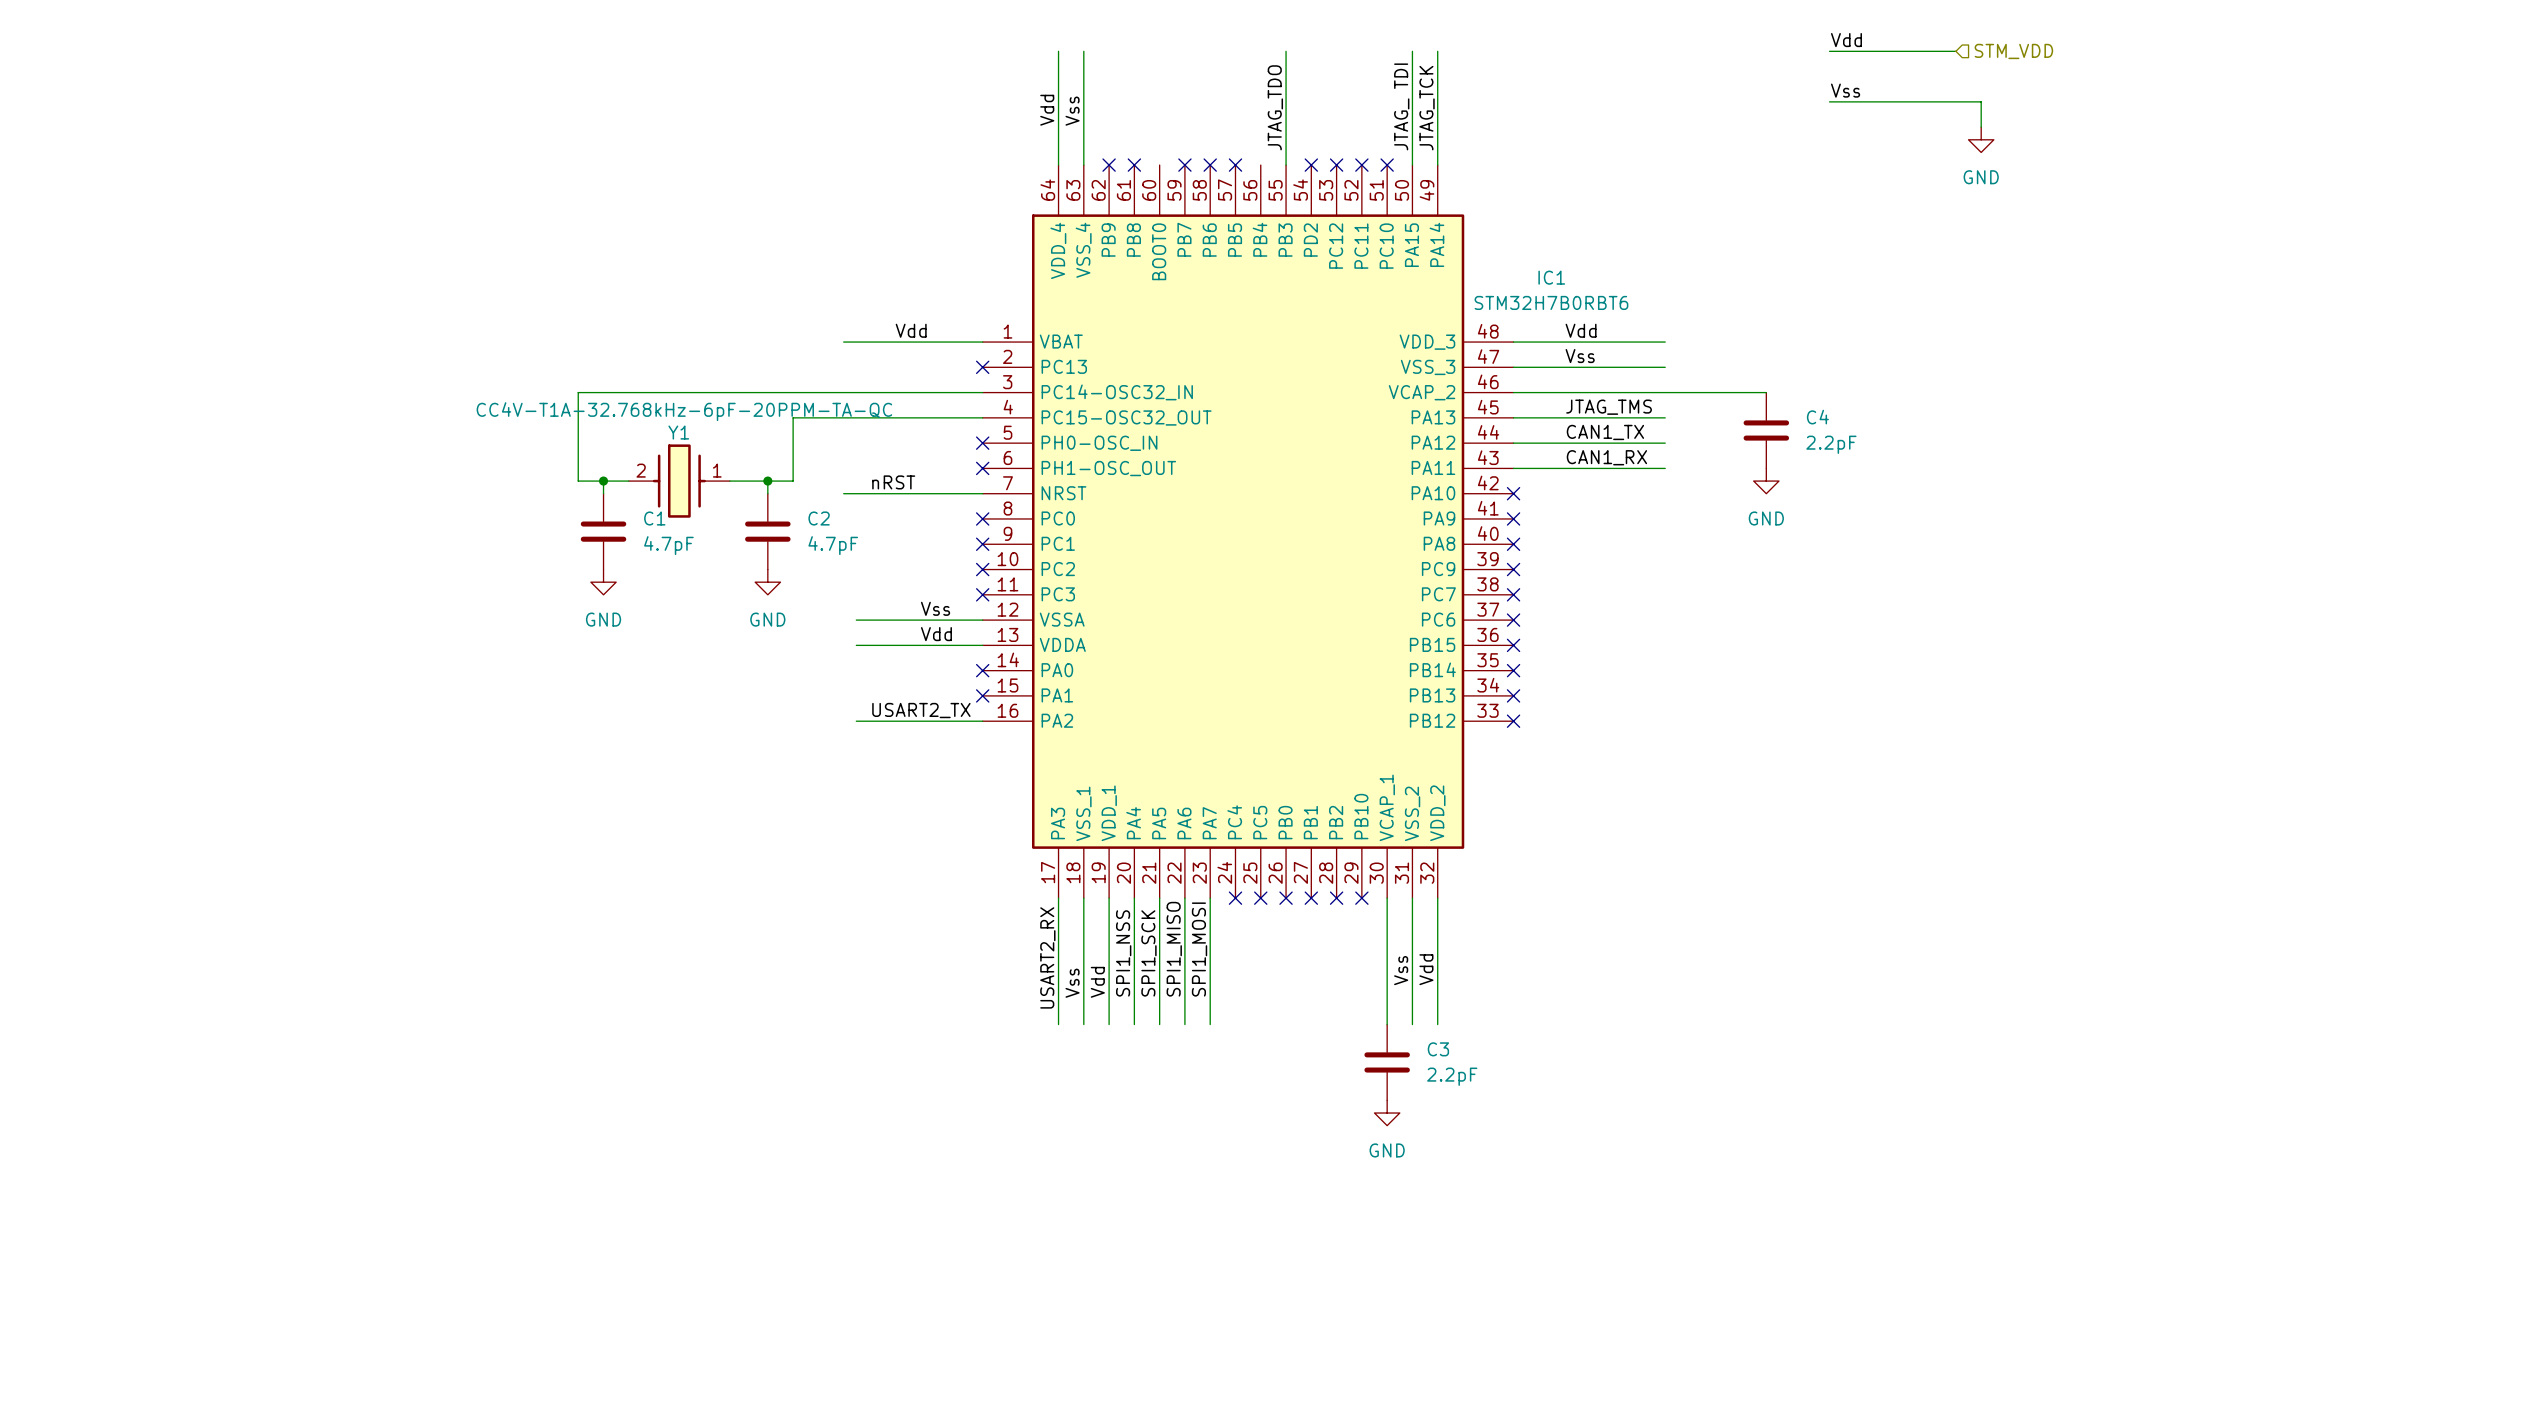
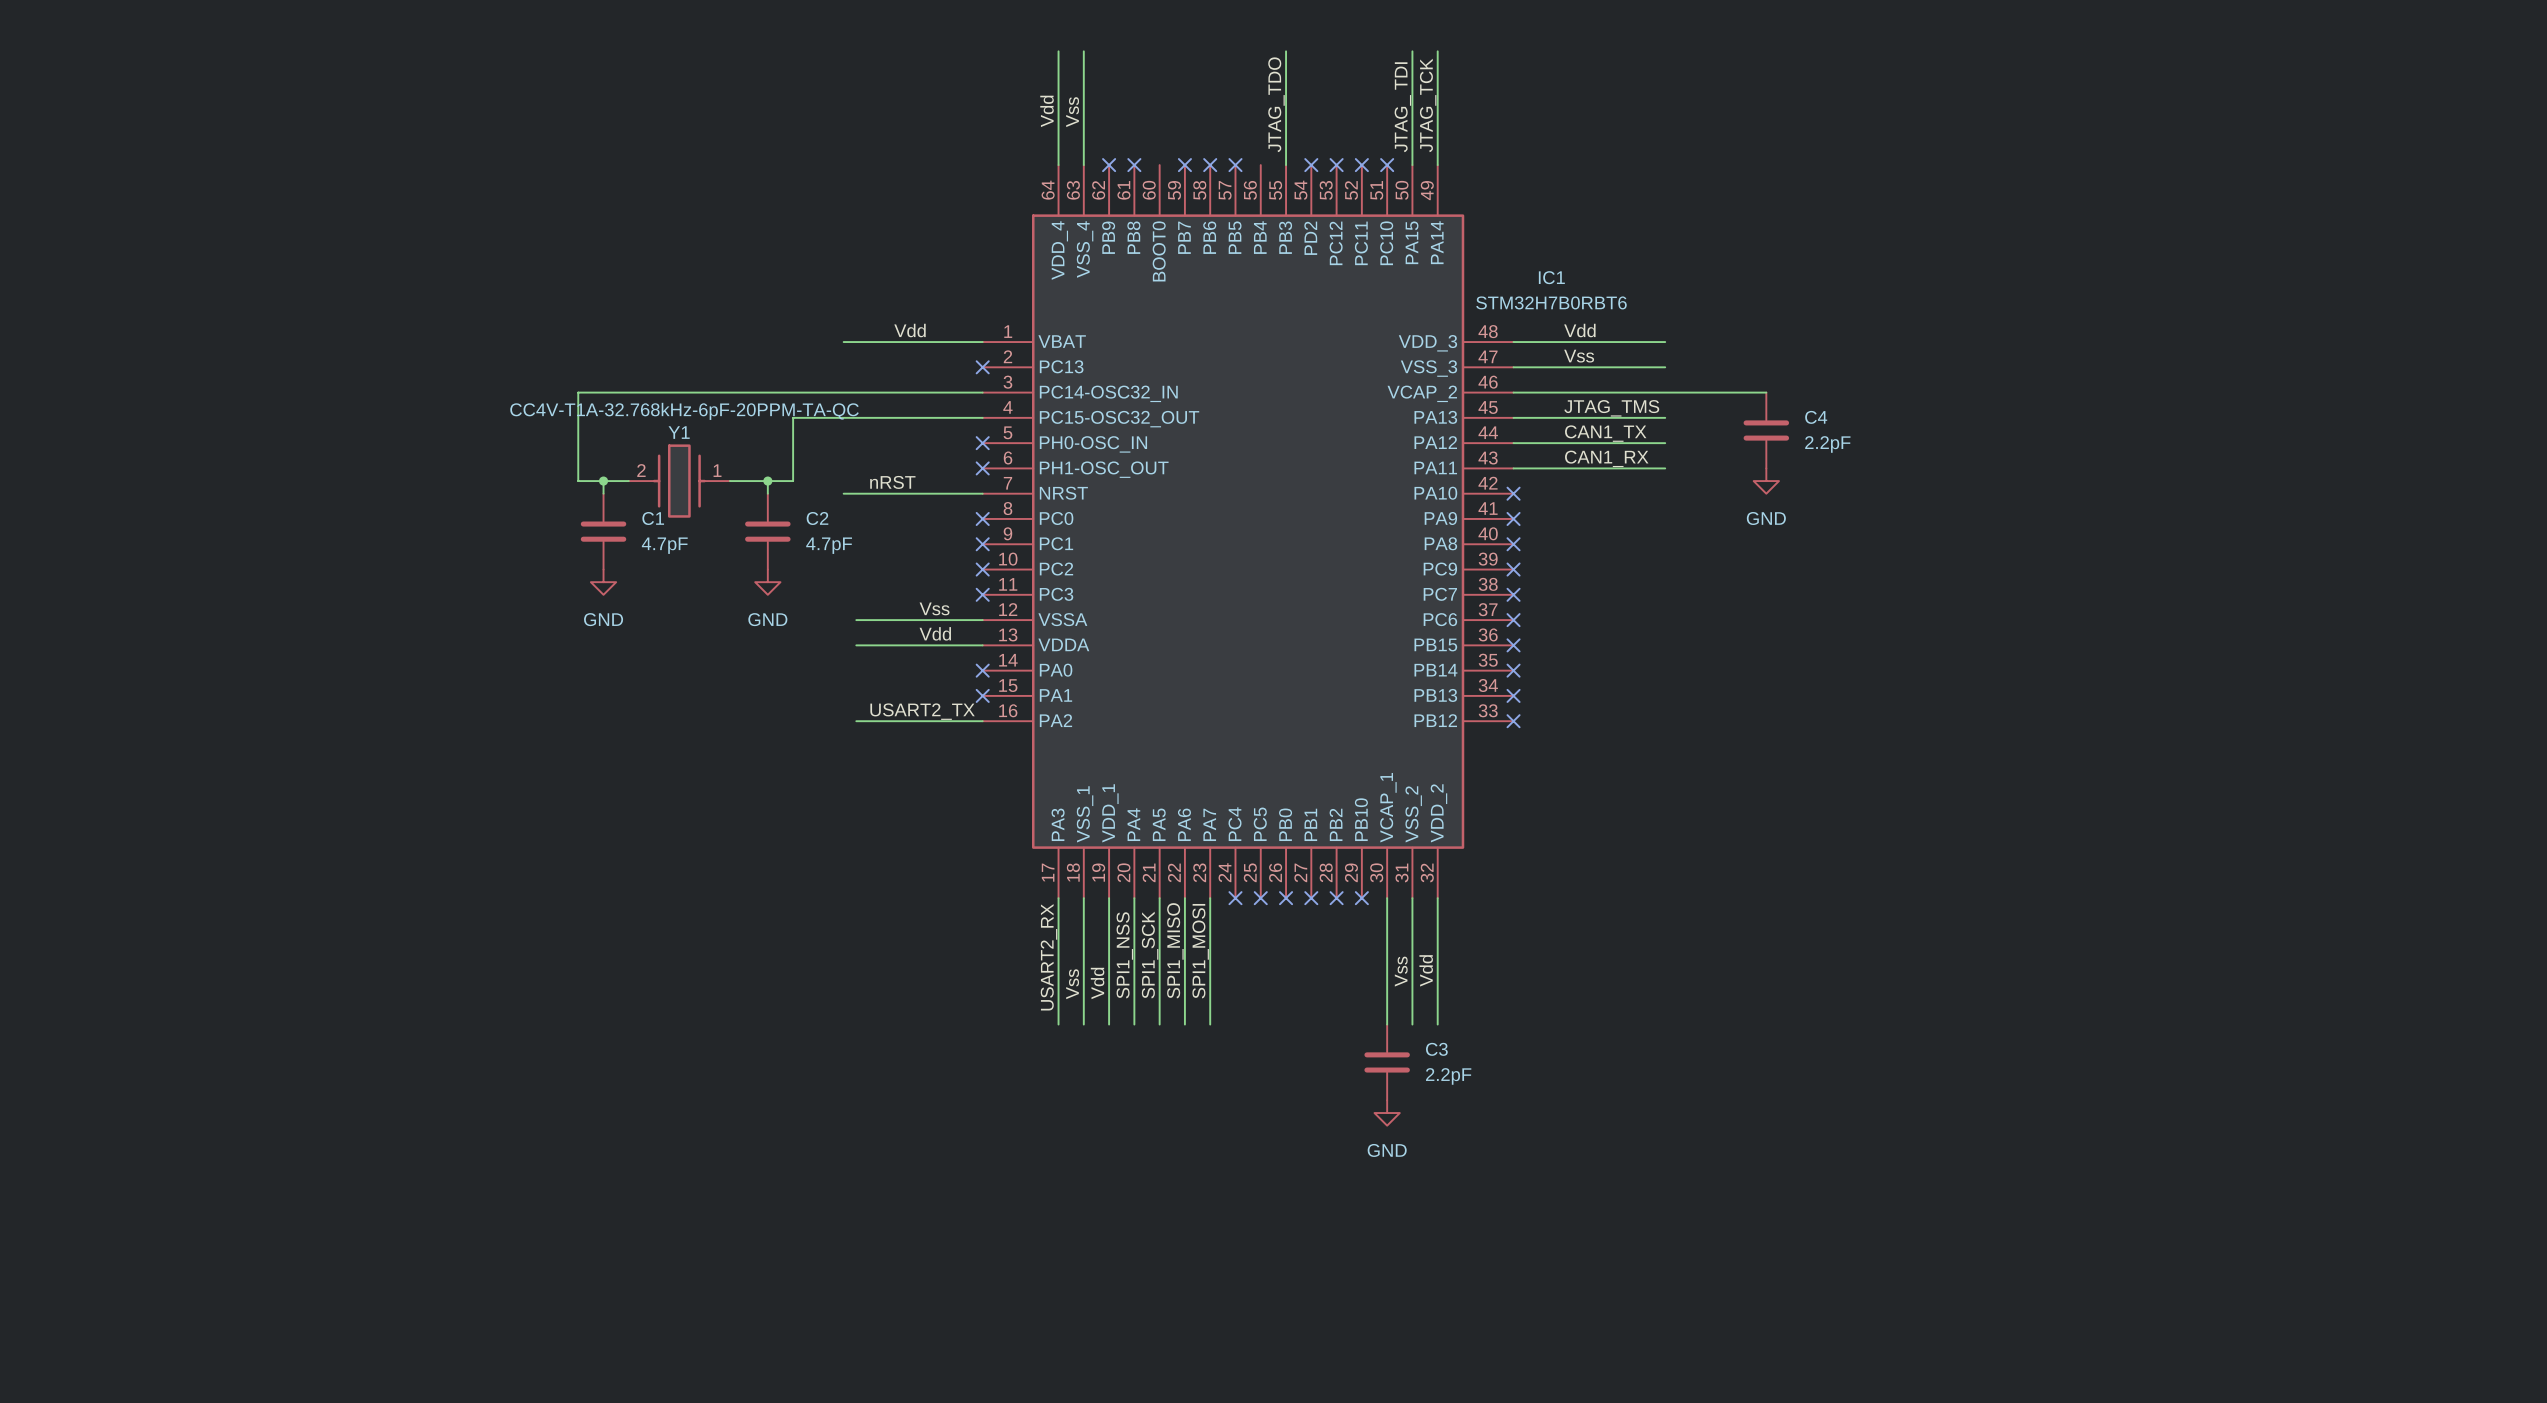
label: Vdd (1846, 40) -> none
wire: (1829, 51) (1955, 51) -> none
hierarchical label: STM_VDD (2013, 51) -> none
label: Vss (1845, 90) -> none
wire: (1829, 101) (1981, 101) (1981, 127) -> none
power symbol: GND (1981, 139) -> none

